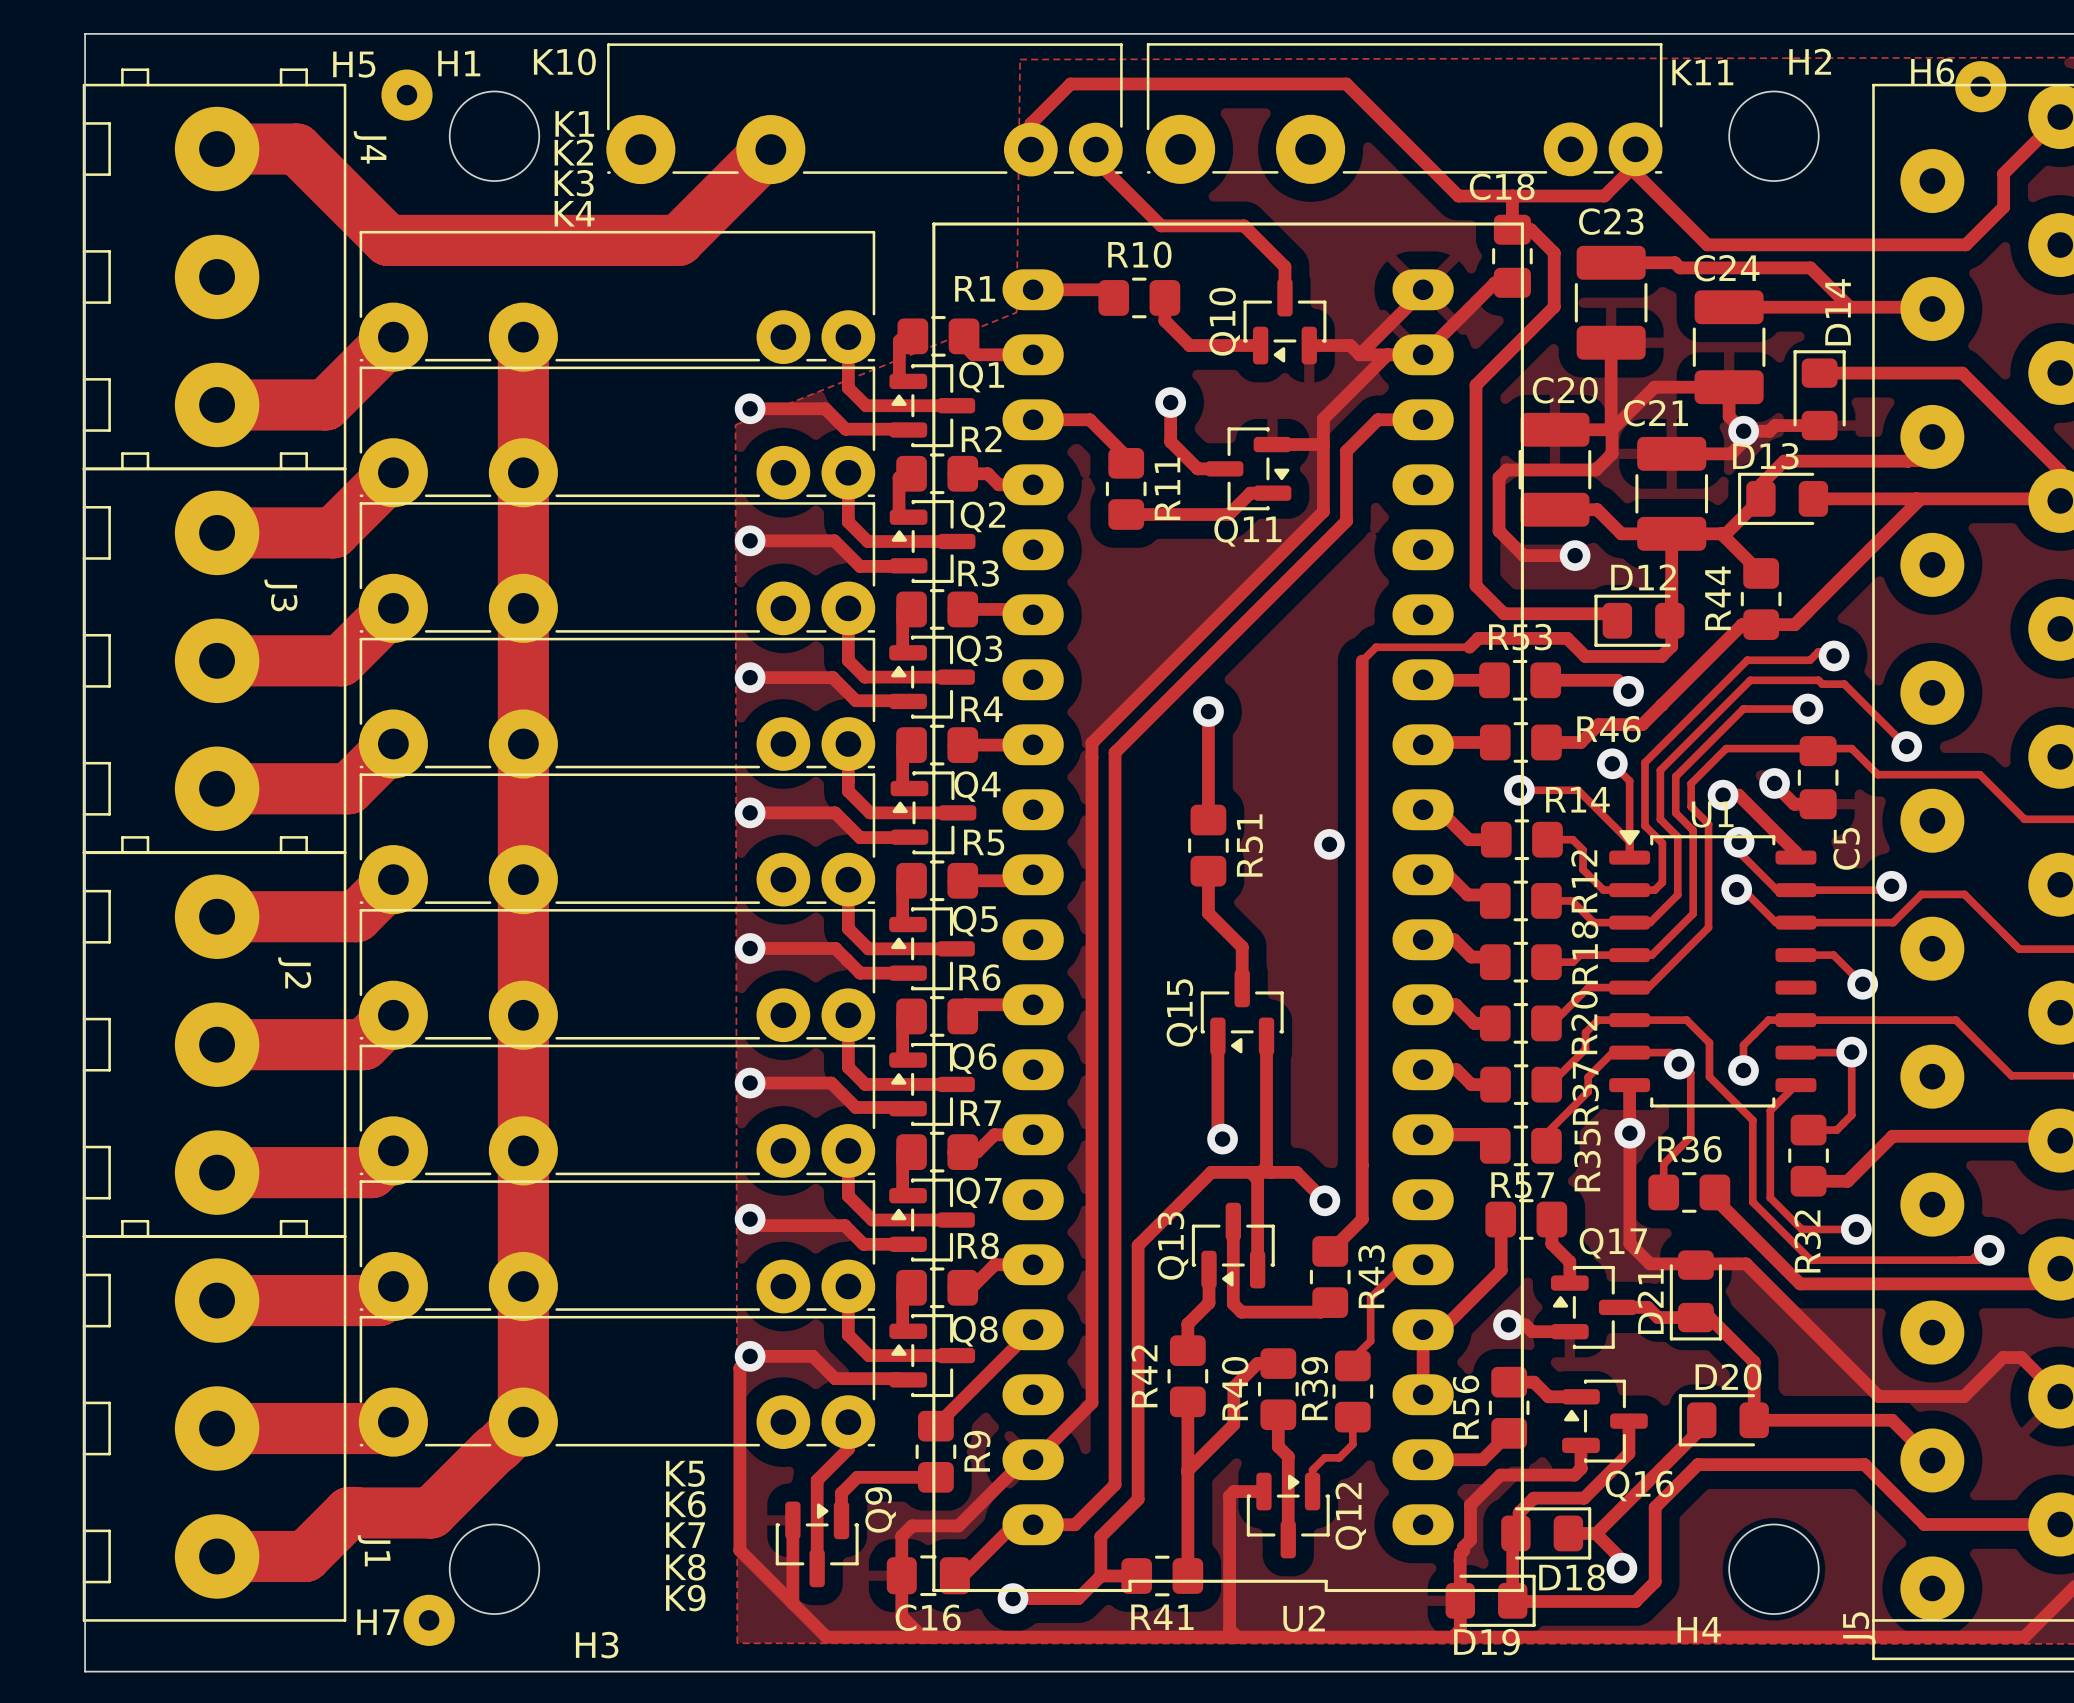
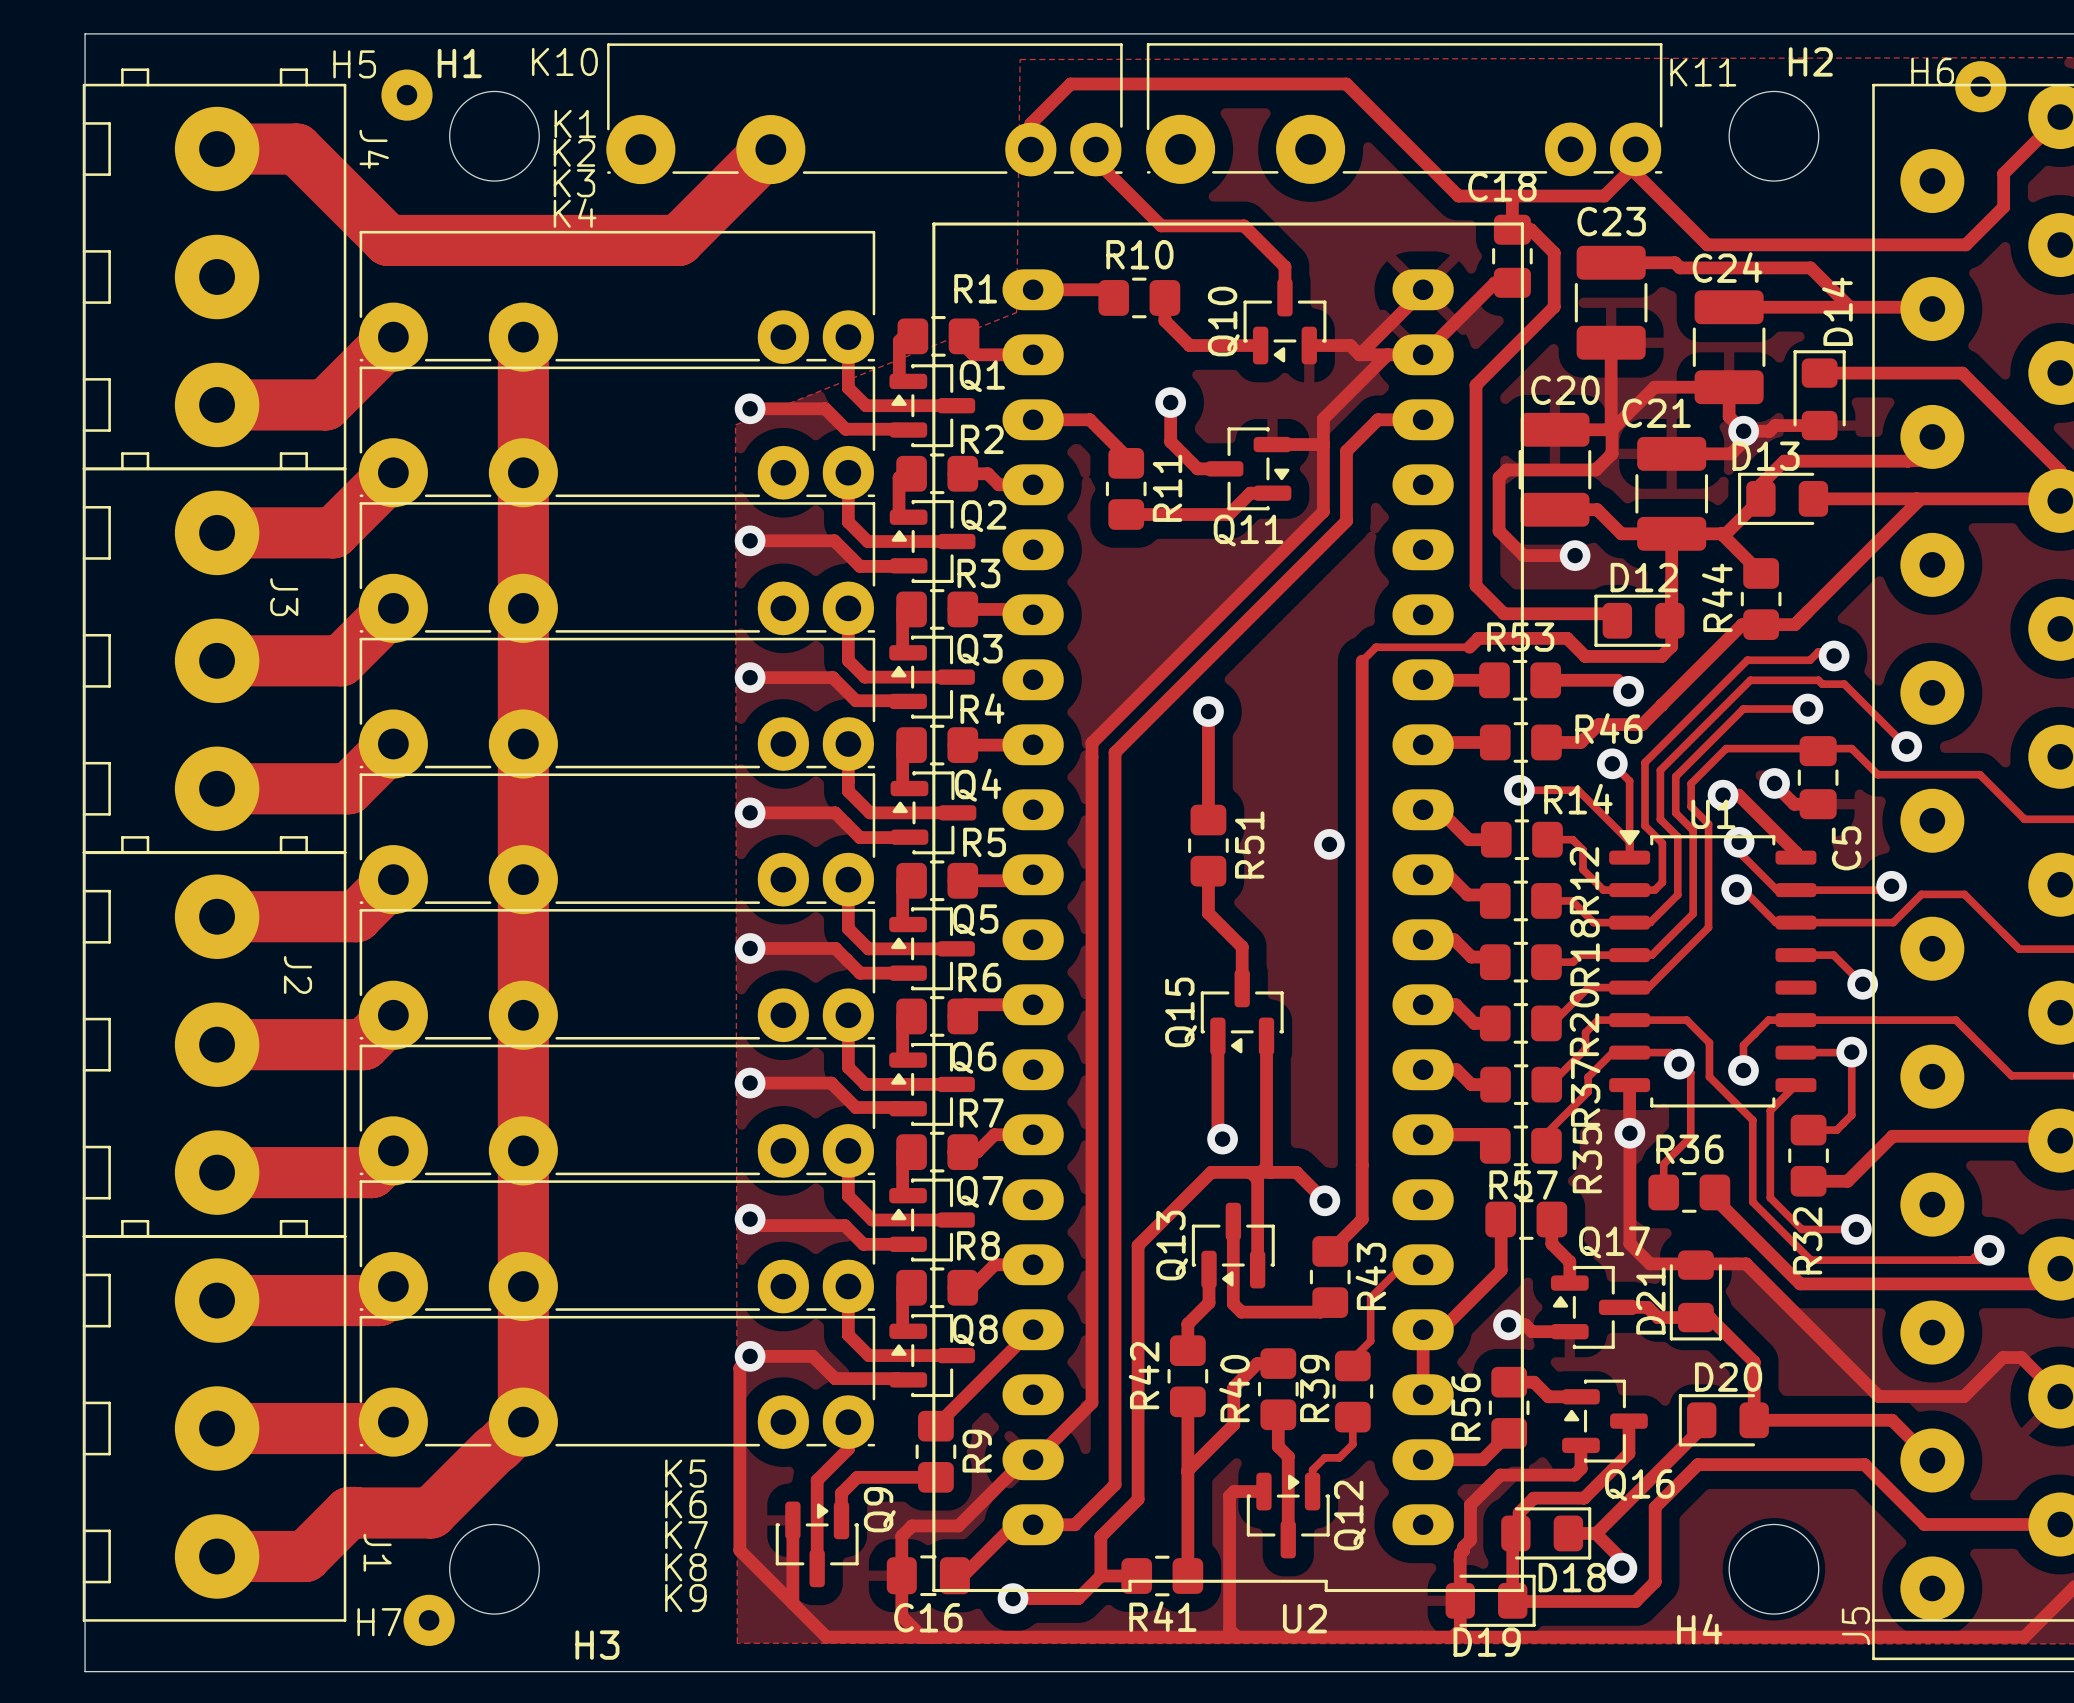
K10 footprint: [606, 43, 1123, 185] -> [606, 43, 1123, 185]
K11 footprint: [1146, 43, 1663, 184] -> [1146, 43, 1663, 184]
K1 footprint: [358, 230, 876, 372] -> [358, 230, 876, 372]
K2 footprint: [358, 366, 876, 508] -> [358, 366, 876, 508]
K3 footprint: [358, 502, 876, 643] -> [358, 502, 876, 643]
K4 footprint: [358, 637, 876, 779] -> [358, 637, 876, 779]
K5 footprint: [358, 773, 876, 915] -> [358, 773, 876, 915]
K6 footprint: [358, 909, 876, 1050] -> [358, 909, 876, 1050]
K7 footprint: [358, 1044, 876, 1186] -> [358, 1044, 876, 1186]
K8 footprint: [358, 1180, 876, 1322] -> [358, 1180, 876, 1322]
K9 footprint: [358, 1315, 876, 1457] -> [358, 1315, 876, 1457]

